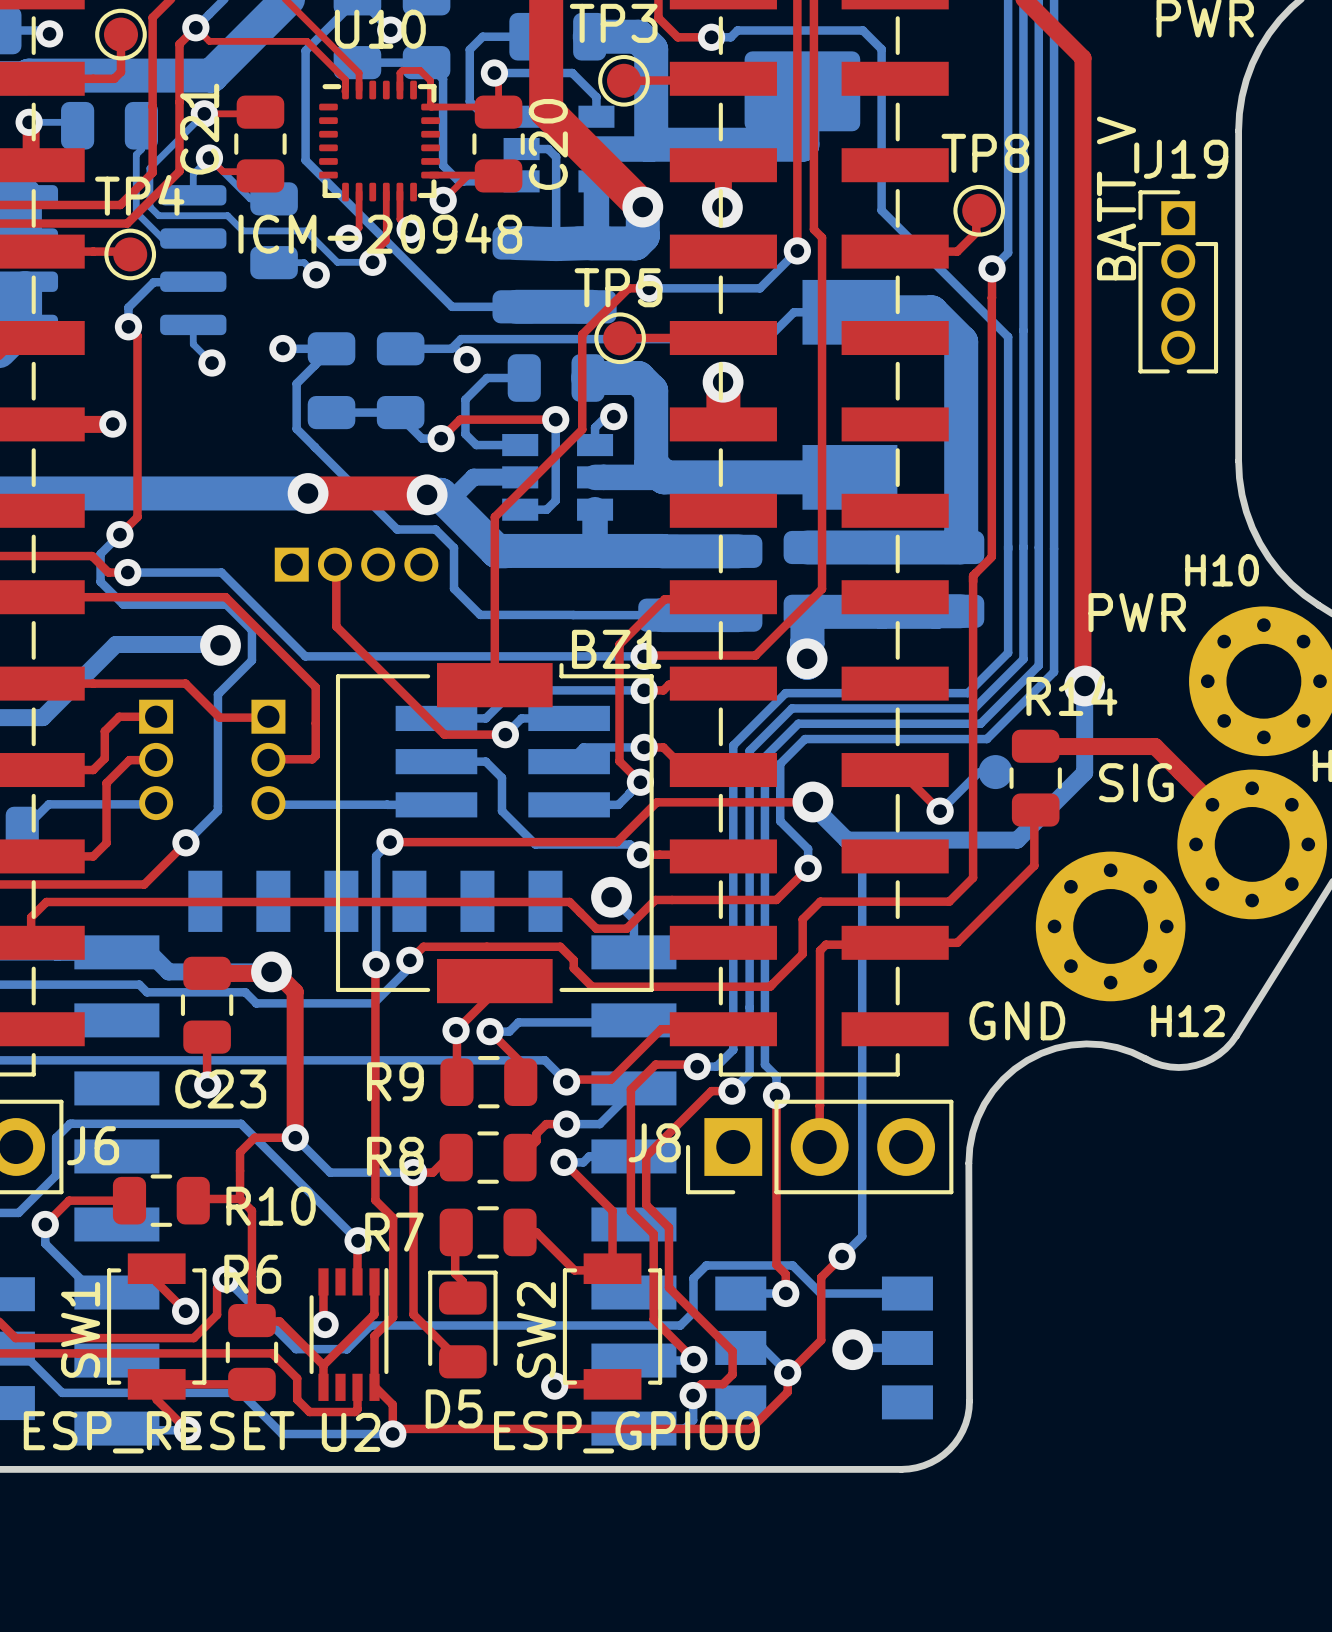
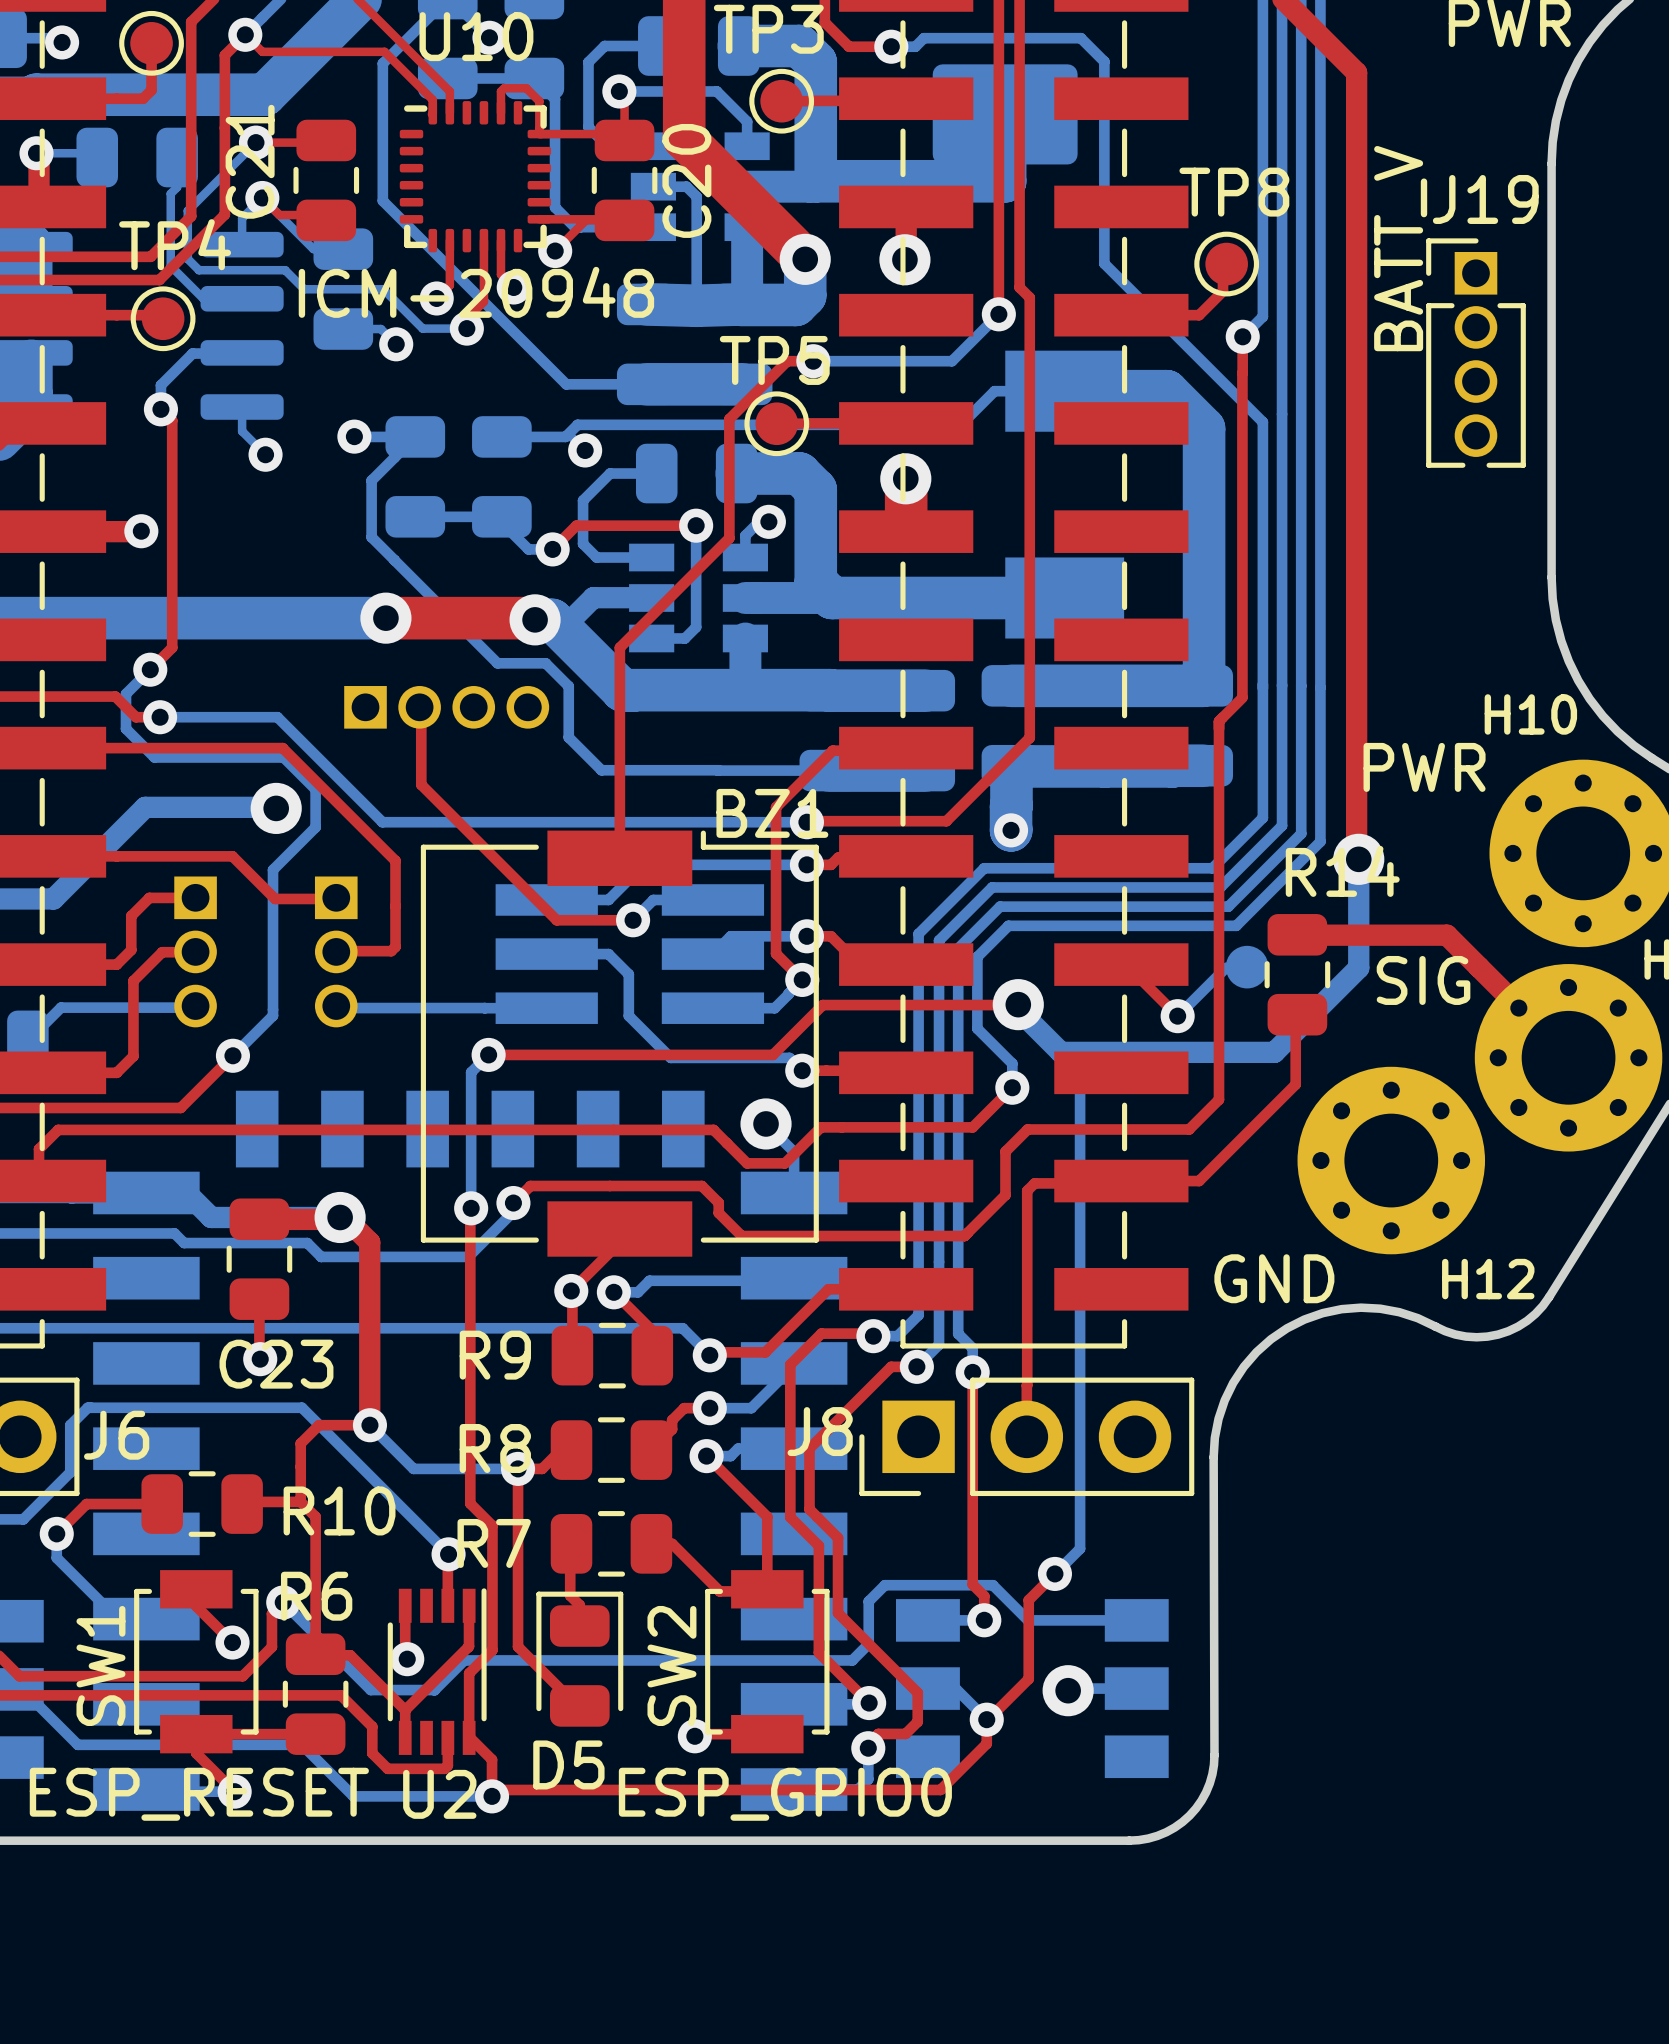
via size: [786, 638, 828, 680] -> [994, 813, 1029, 848]

